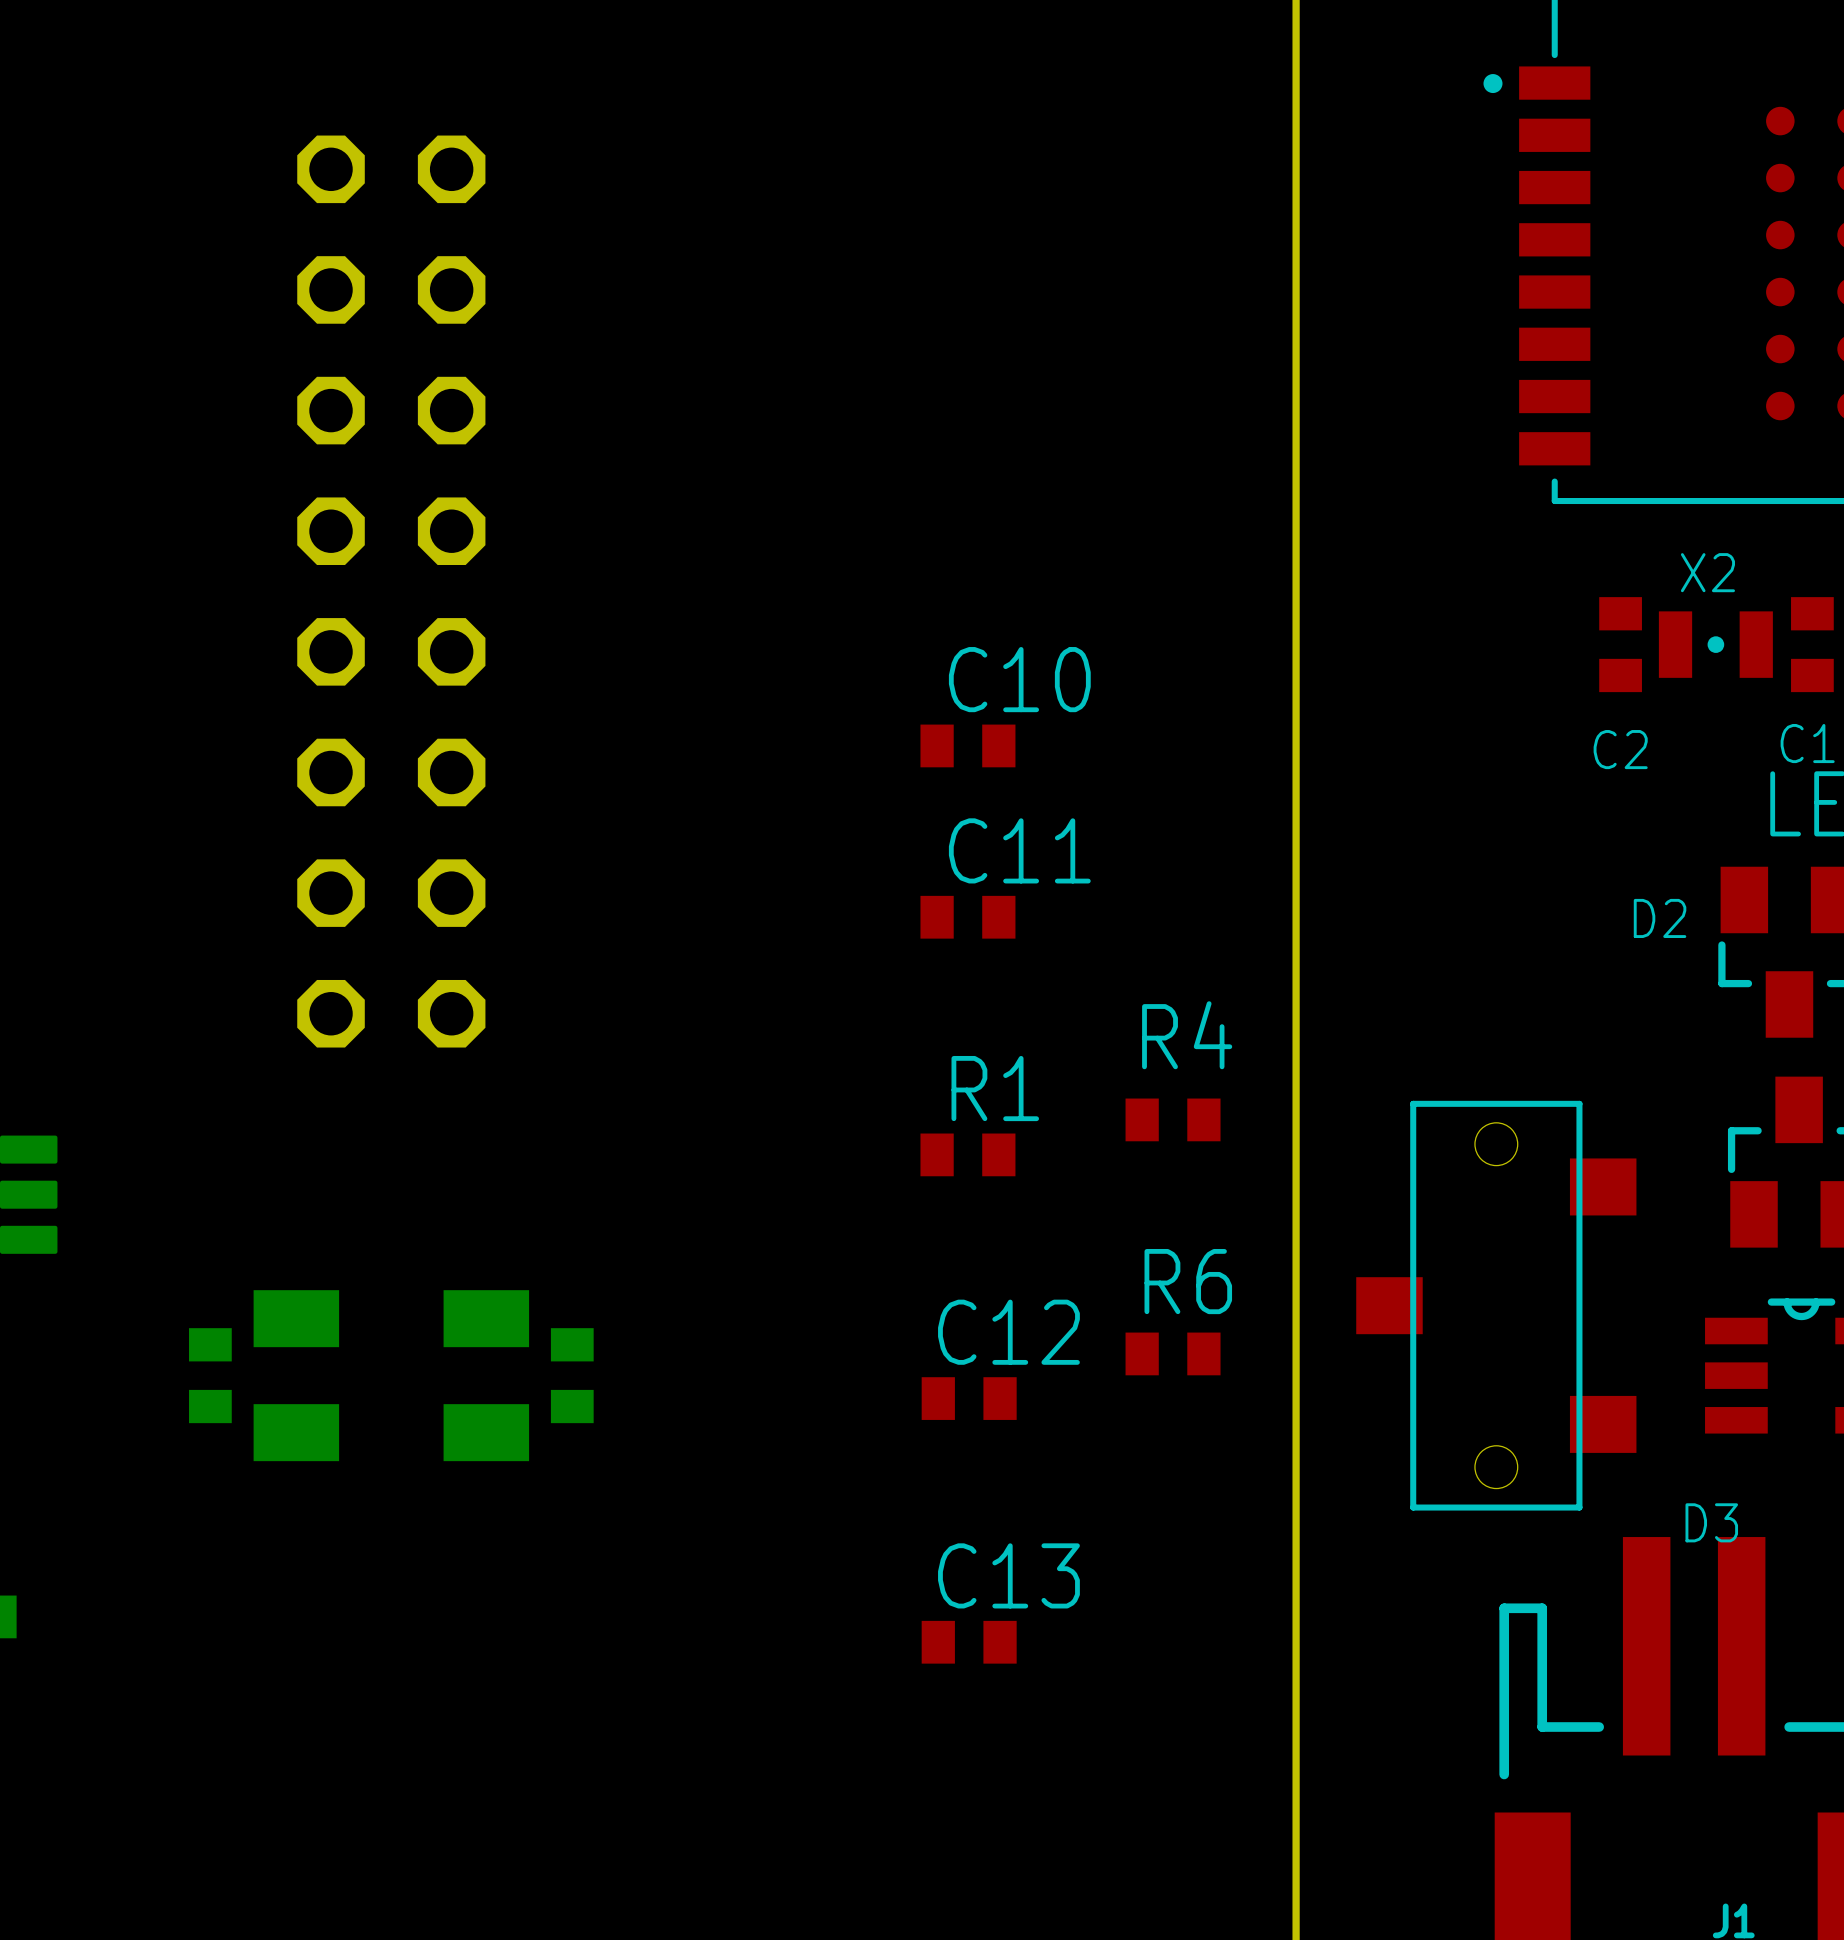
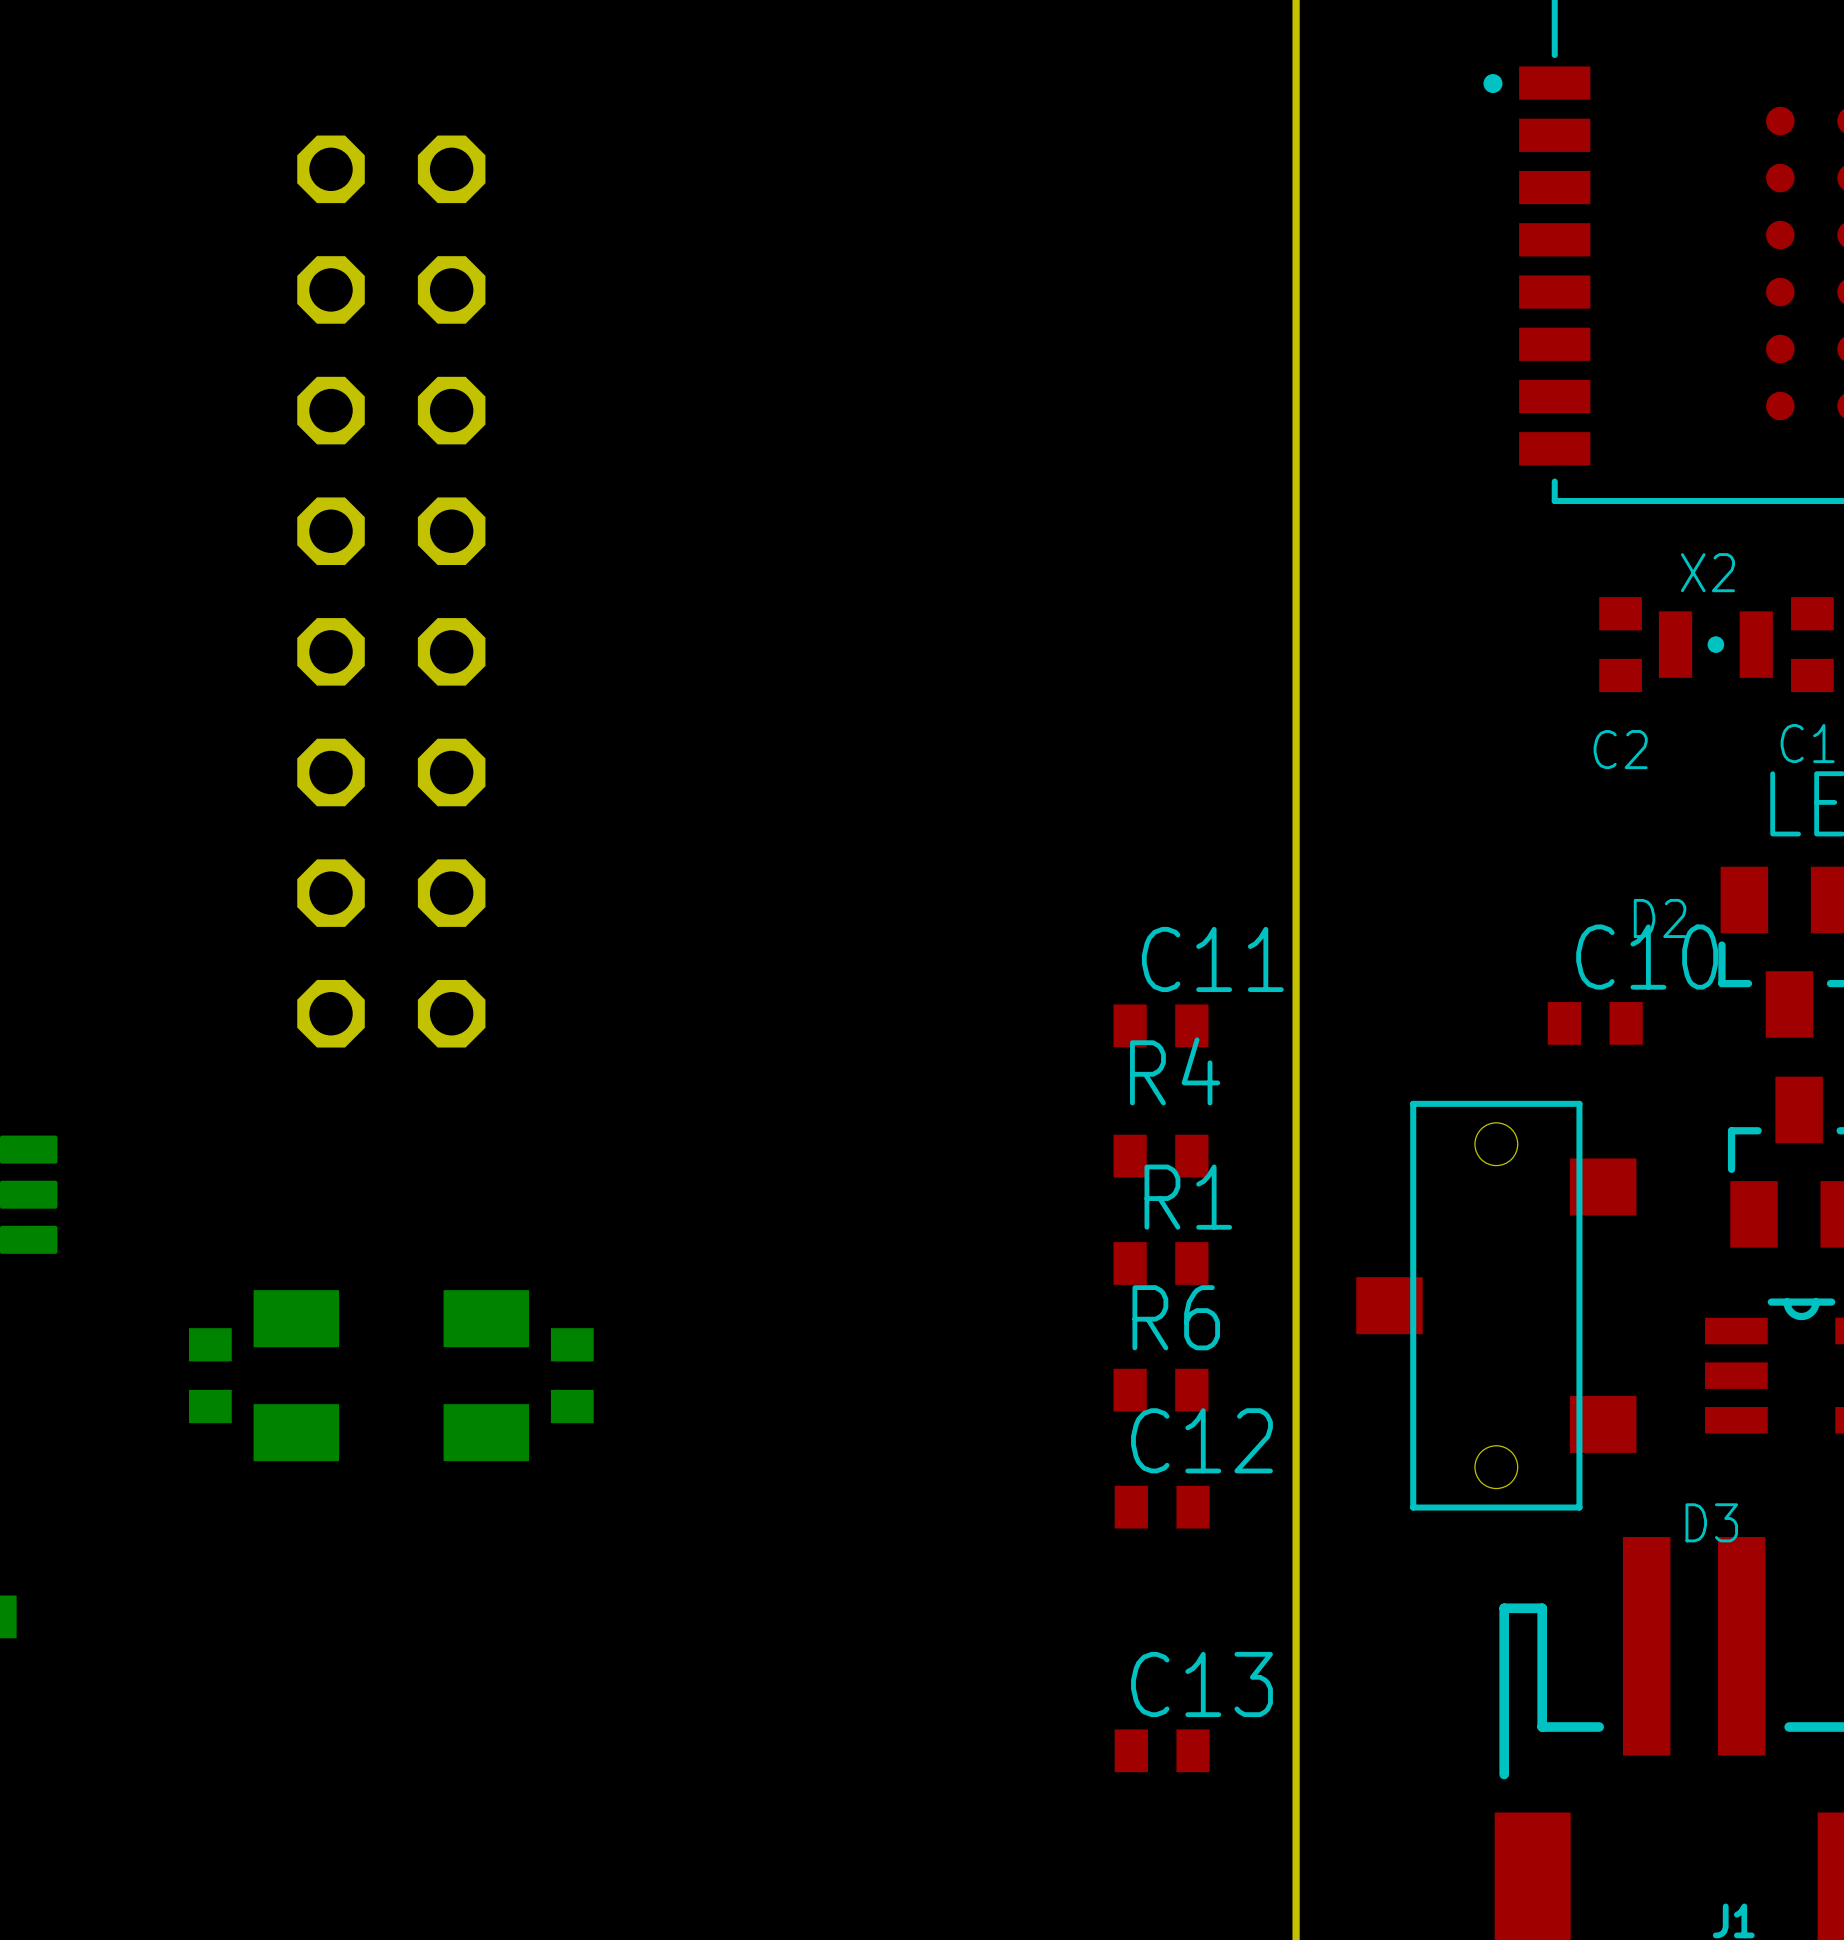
C10 position: (967, 745) -> (1595, 1023)
C11 position: (967, 917) -> (1160, 1025)
R4 position: (1173, 1119) -> (1160, 1156)
R1 position: (967, 1154) -> (1160, 1263)
R6 position: (1173, 1353) -> (1160, 1390)
C12 position: (969, 1398) -> (1162, 1507)
C13 position: (969, 1642) -> (1162, 1750)

